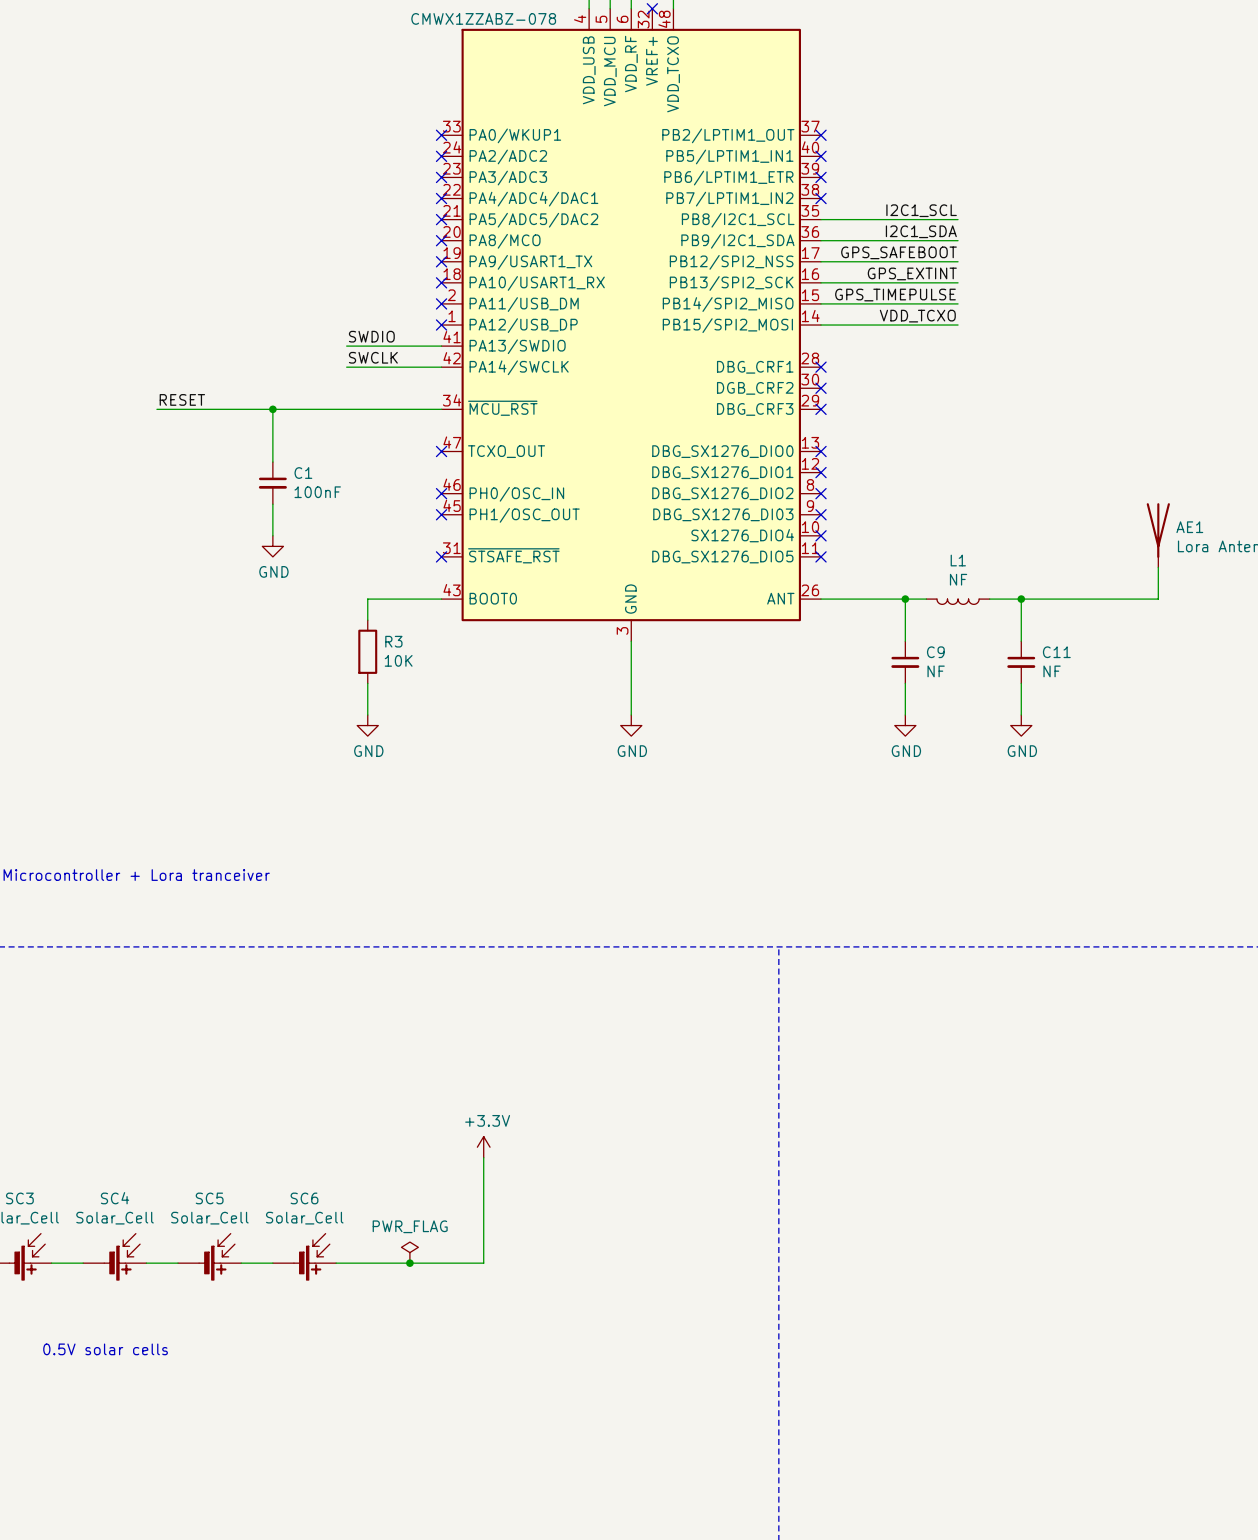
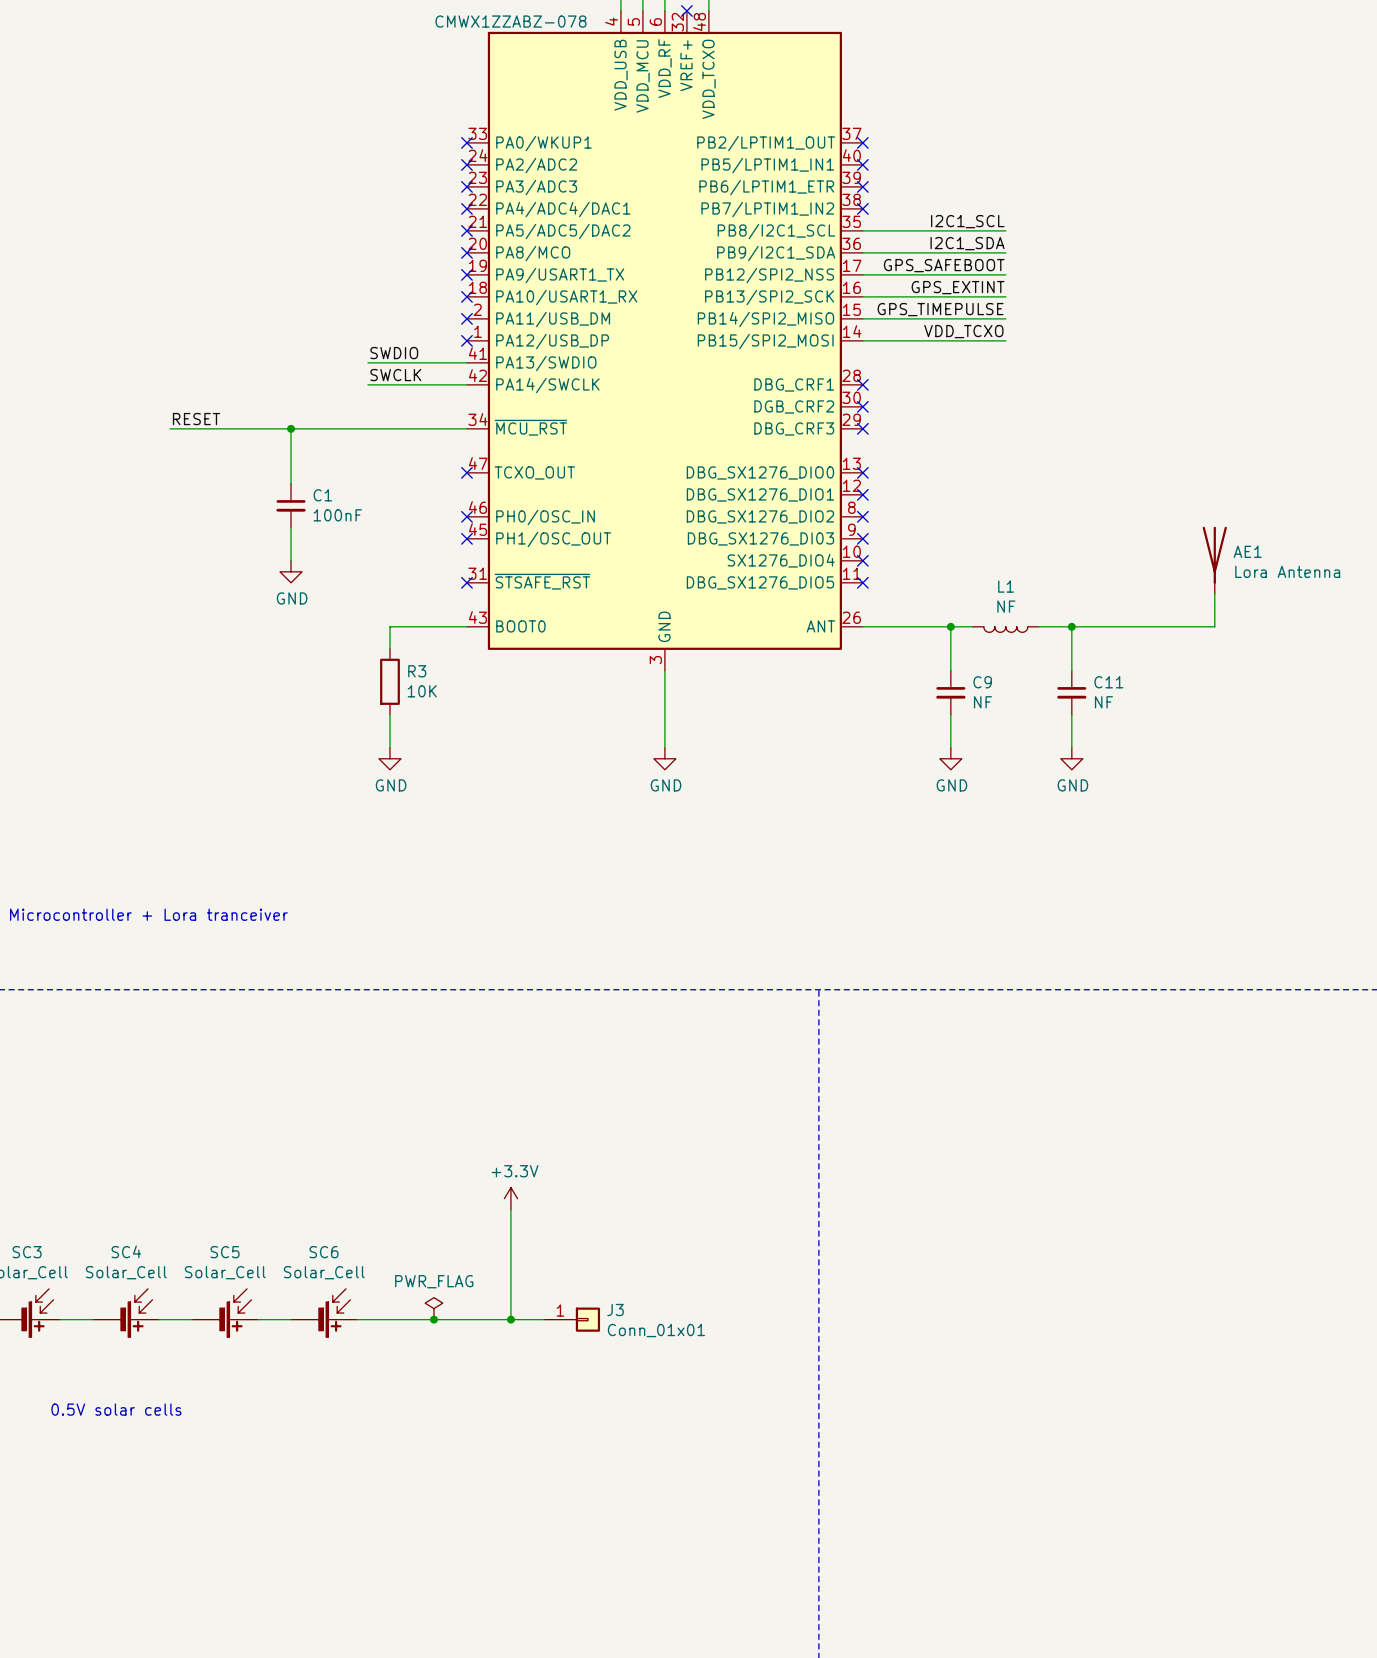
wire: none -> (510, 1319) (543, 1319)
junction: none -> (510, 1319)
J3: none -> Conn_01x01 (571, 1319)

